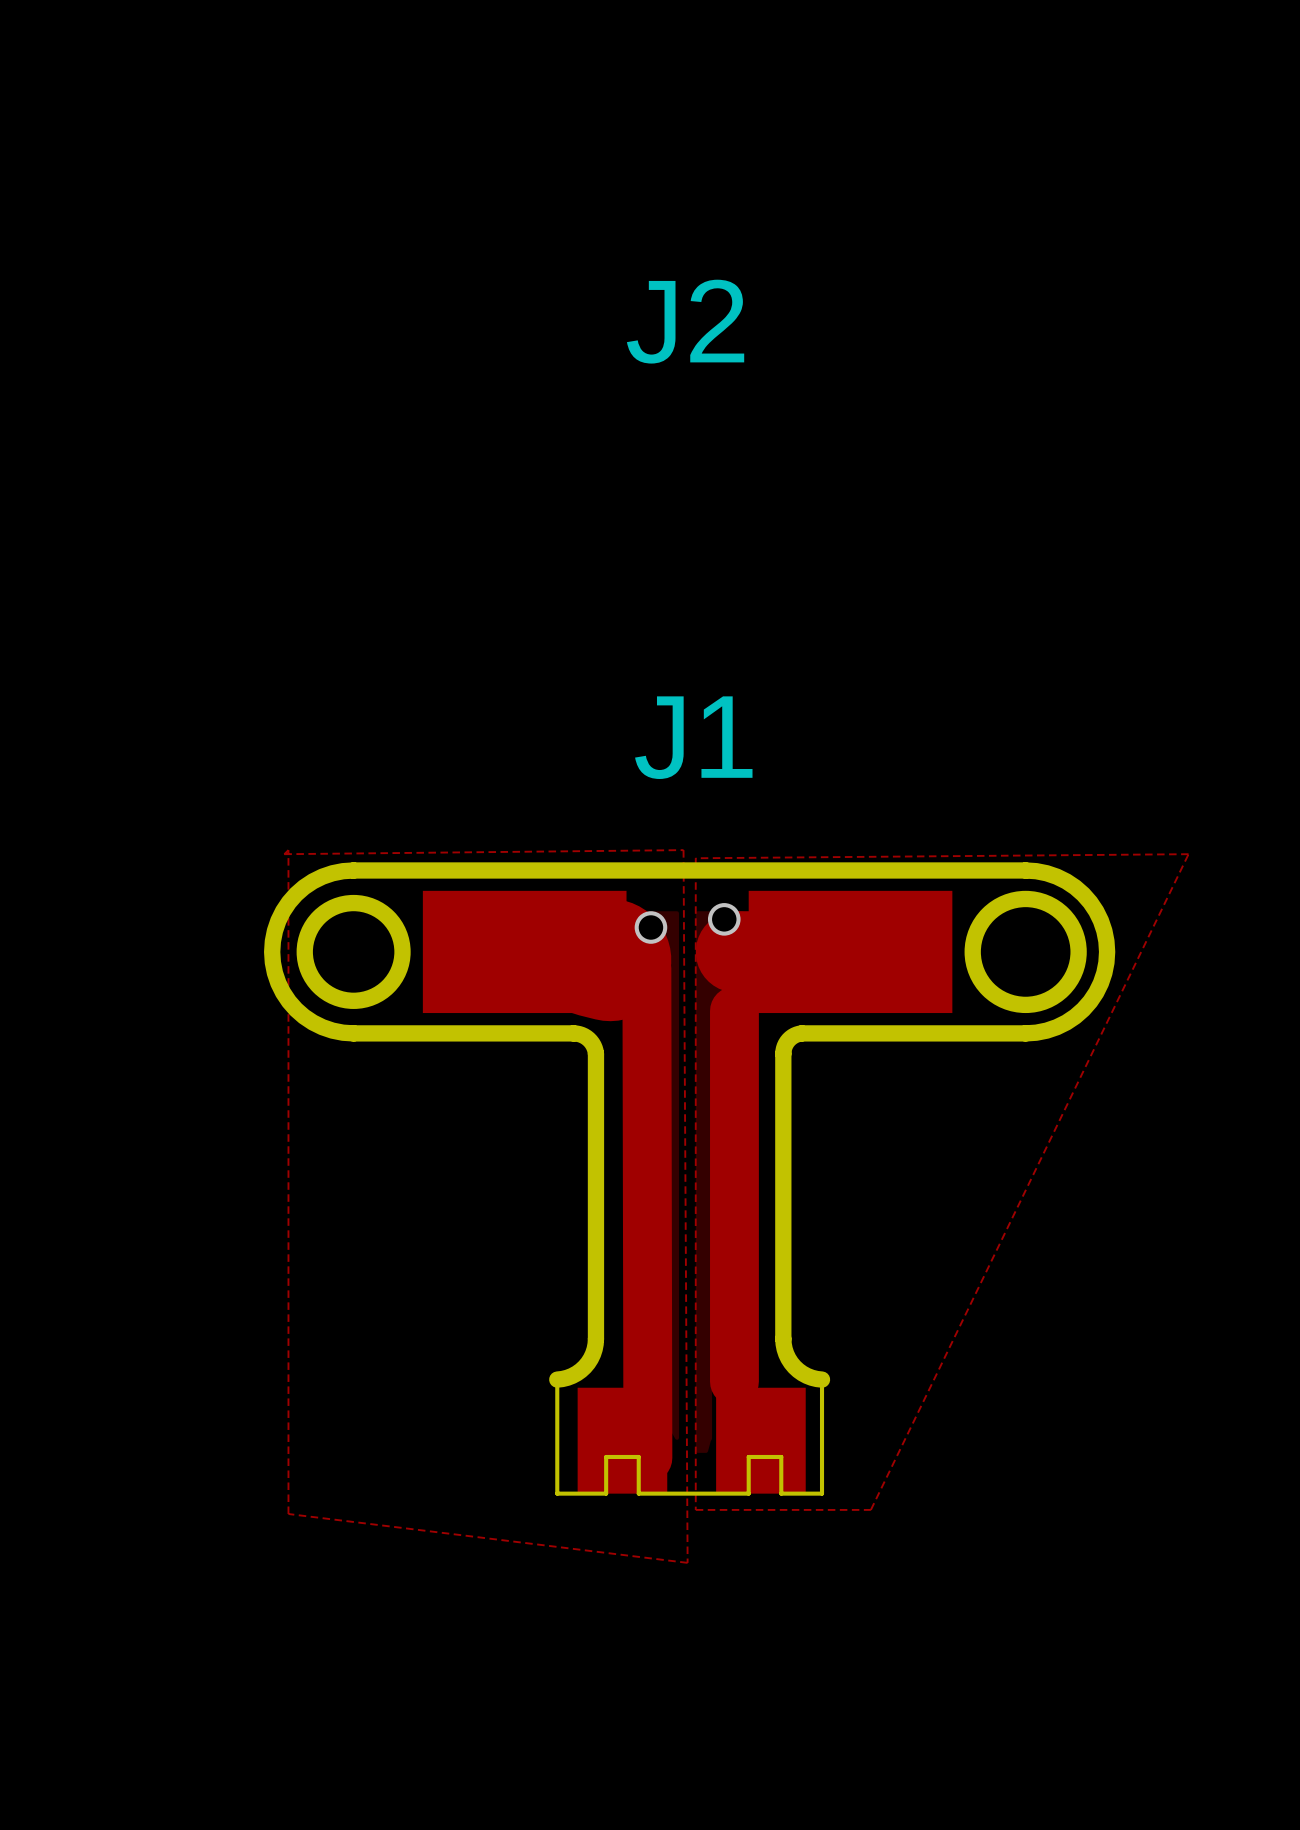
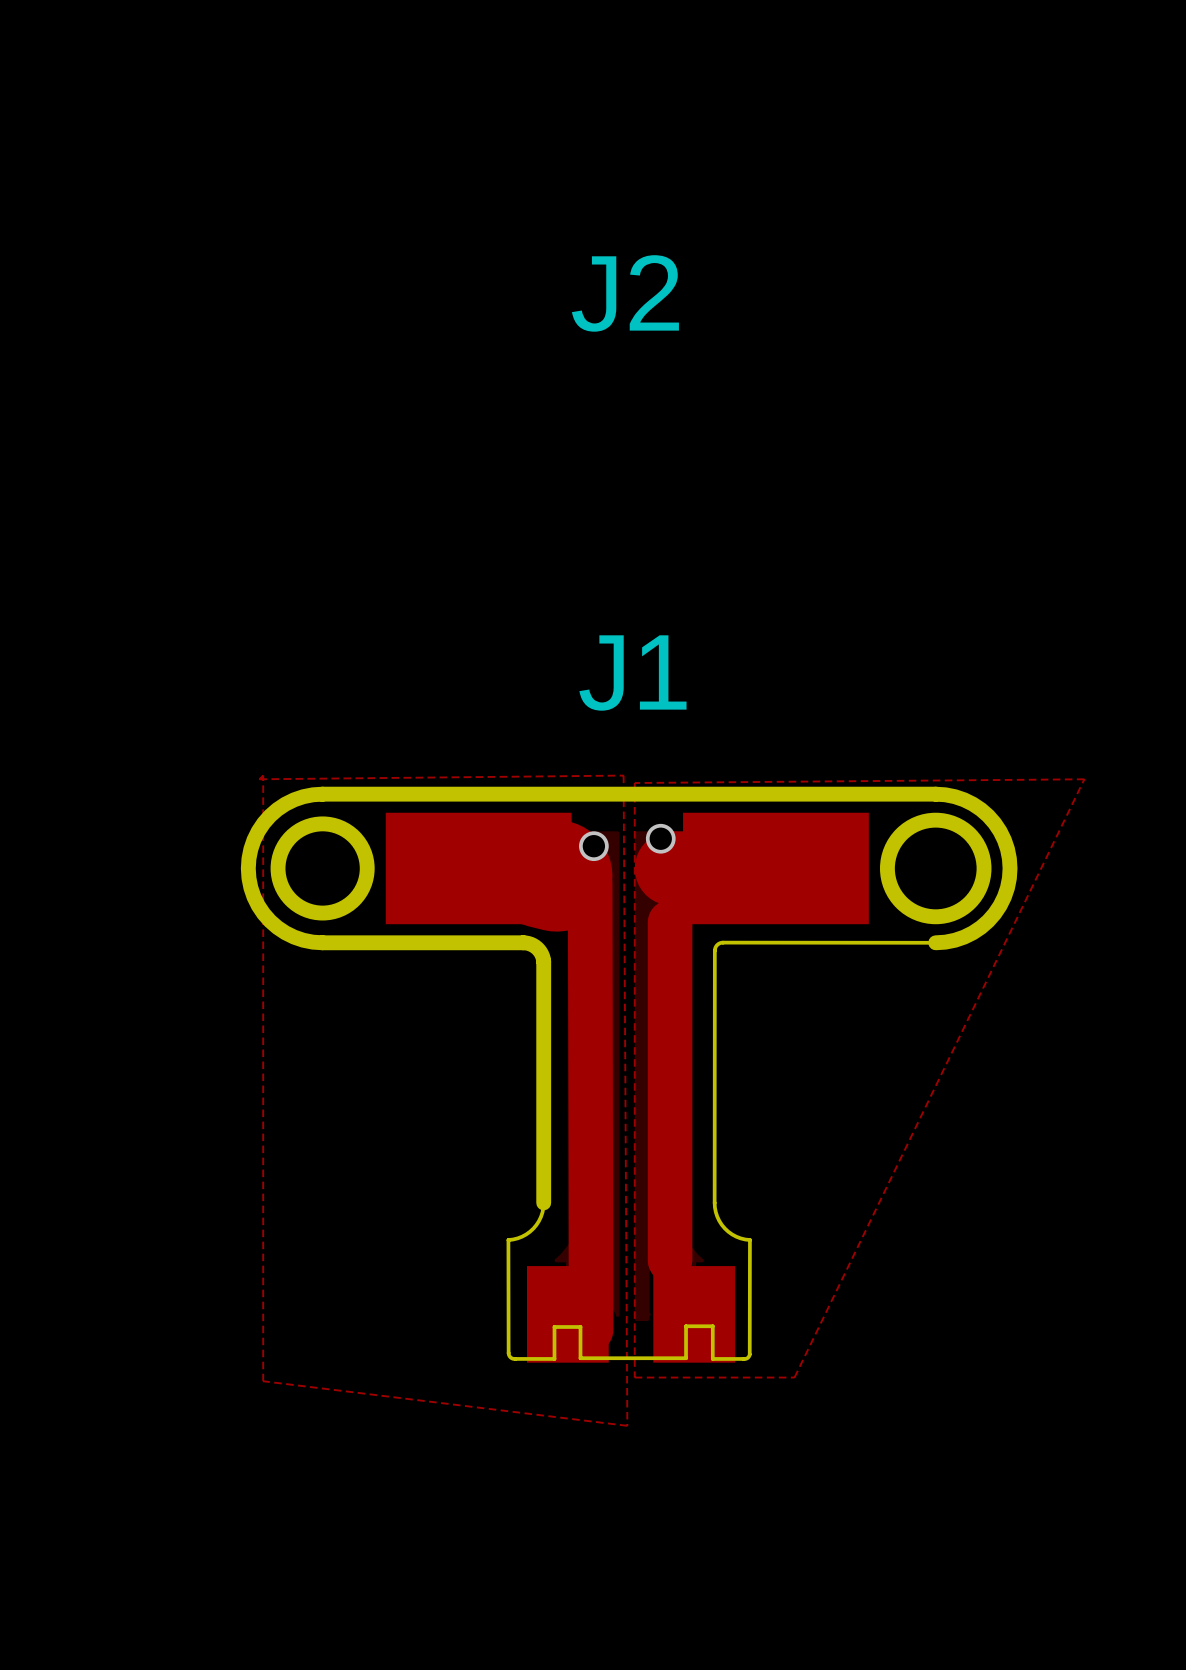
board edge: (1025, 1033) (801, 1033) (792, 1036) (785, 1044) (783, 1053) (783, 1344) (788, 1358) (798, 1370) (807, 1375) (822, 1379) (822, 1493) (781, 1493) (781, 1489) -> (935, 942) (723, 942) (715, 947) (714, 1207) (719, 1220) (728, 1231) (736, 1236) (749, 1240) (749, 1354) (744, 1358) (712, 1358)
board edge: (595, 1318) (595, 1344) (590, 1358) (576, 1373) (557, 1379) (557, 1493) (606, 1493) (606, 1456) (638, 1456) (638, 1493) (748, 1493) (748, 1456) (781, 1456) -> (543, 1202) (541, 1216) (533, 1228) (522, 1236) (508, 1240) (508, 1352) (511, 1357) (554, 1358) (554, 1327) (580, 1327) (580, 1358) (686, 1358) (686, 1326) (712, 1326) (712, 1329)

